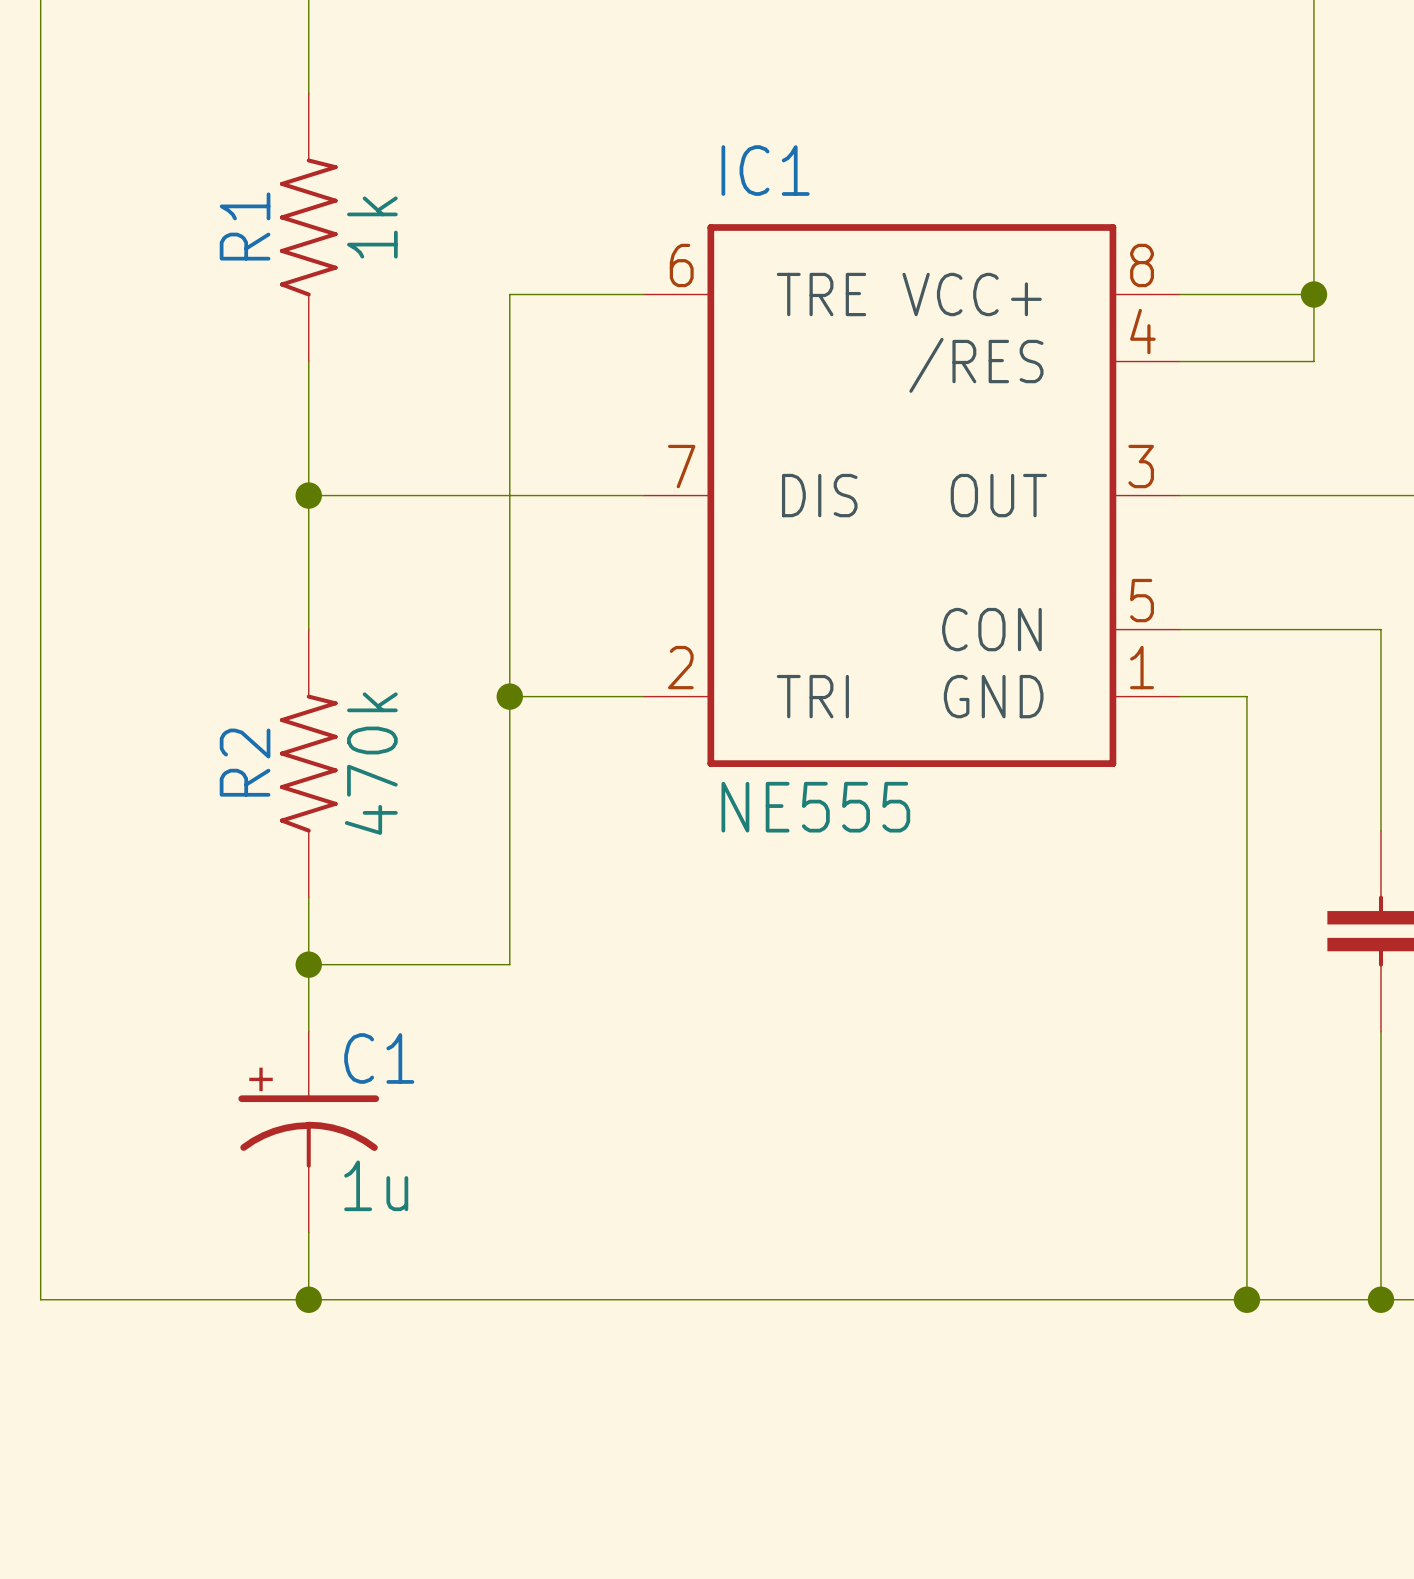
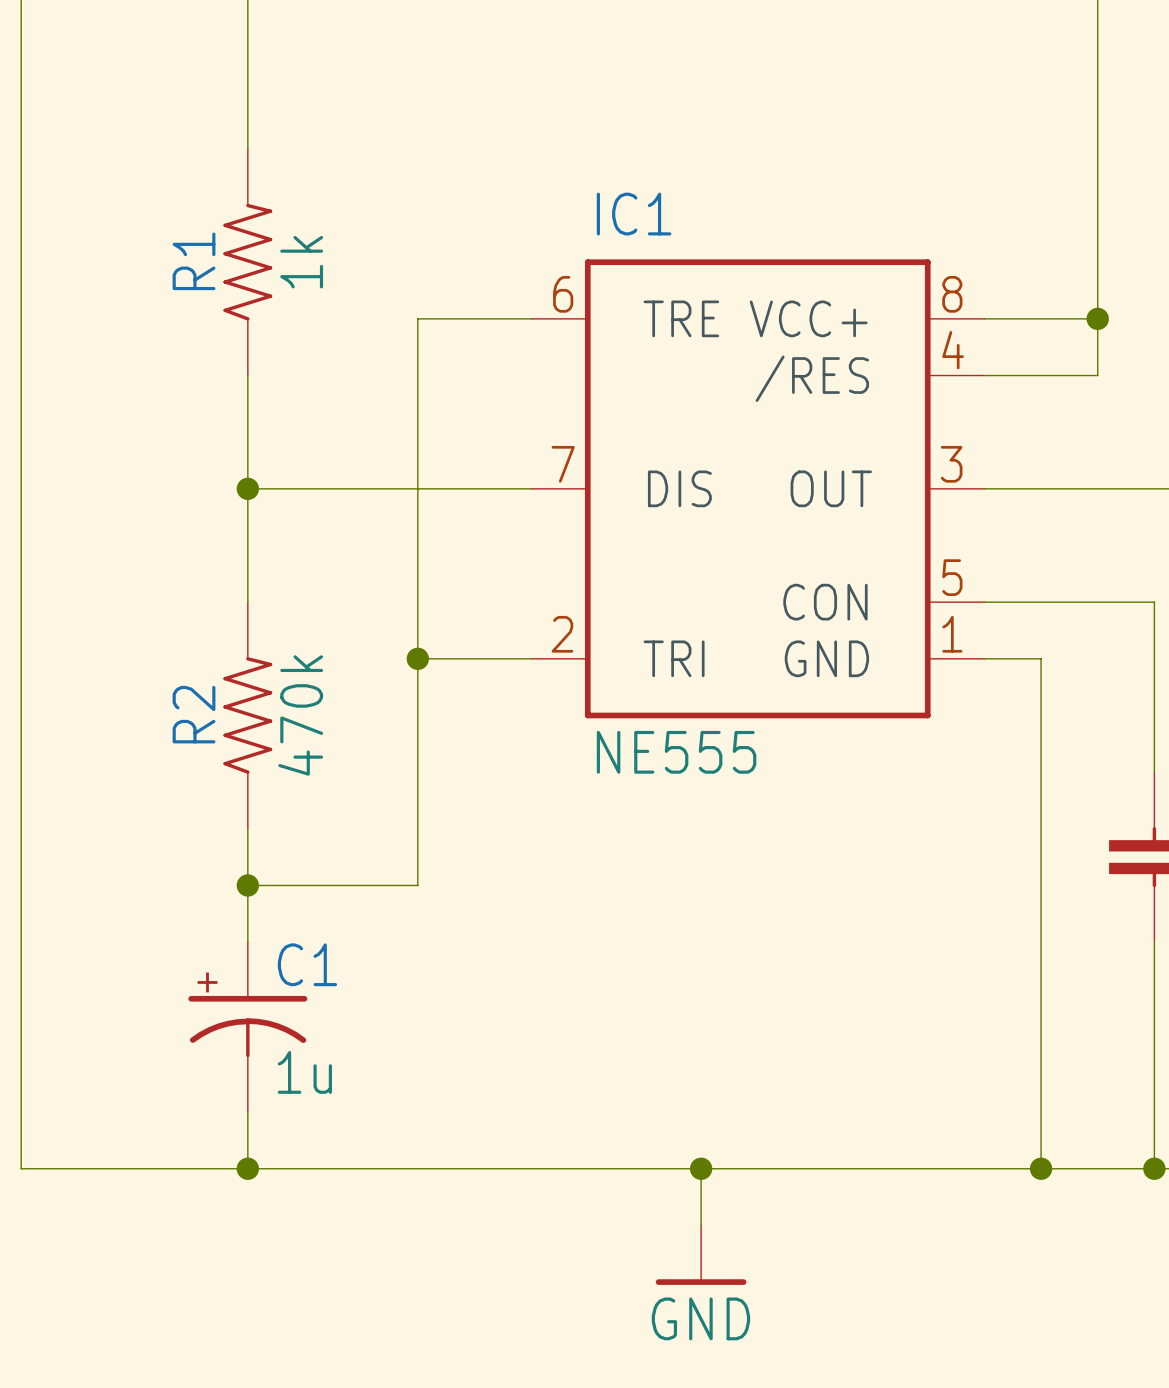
wire: none -> (701, 1168) (701, 1225)
junction: none -> (701, 1168)
power symbol: none -> GND (701, 1255)

